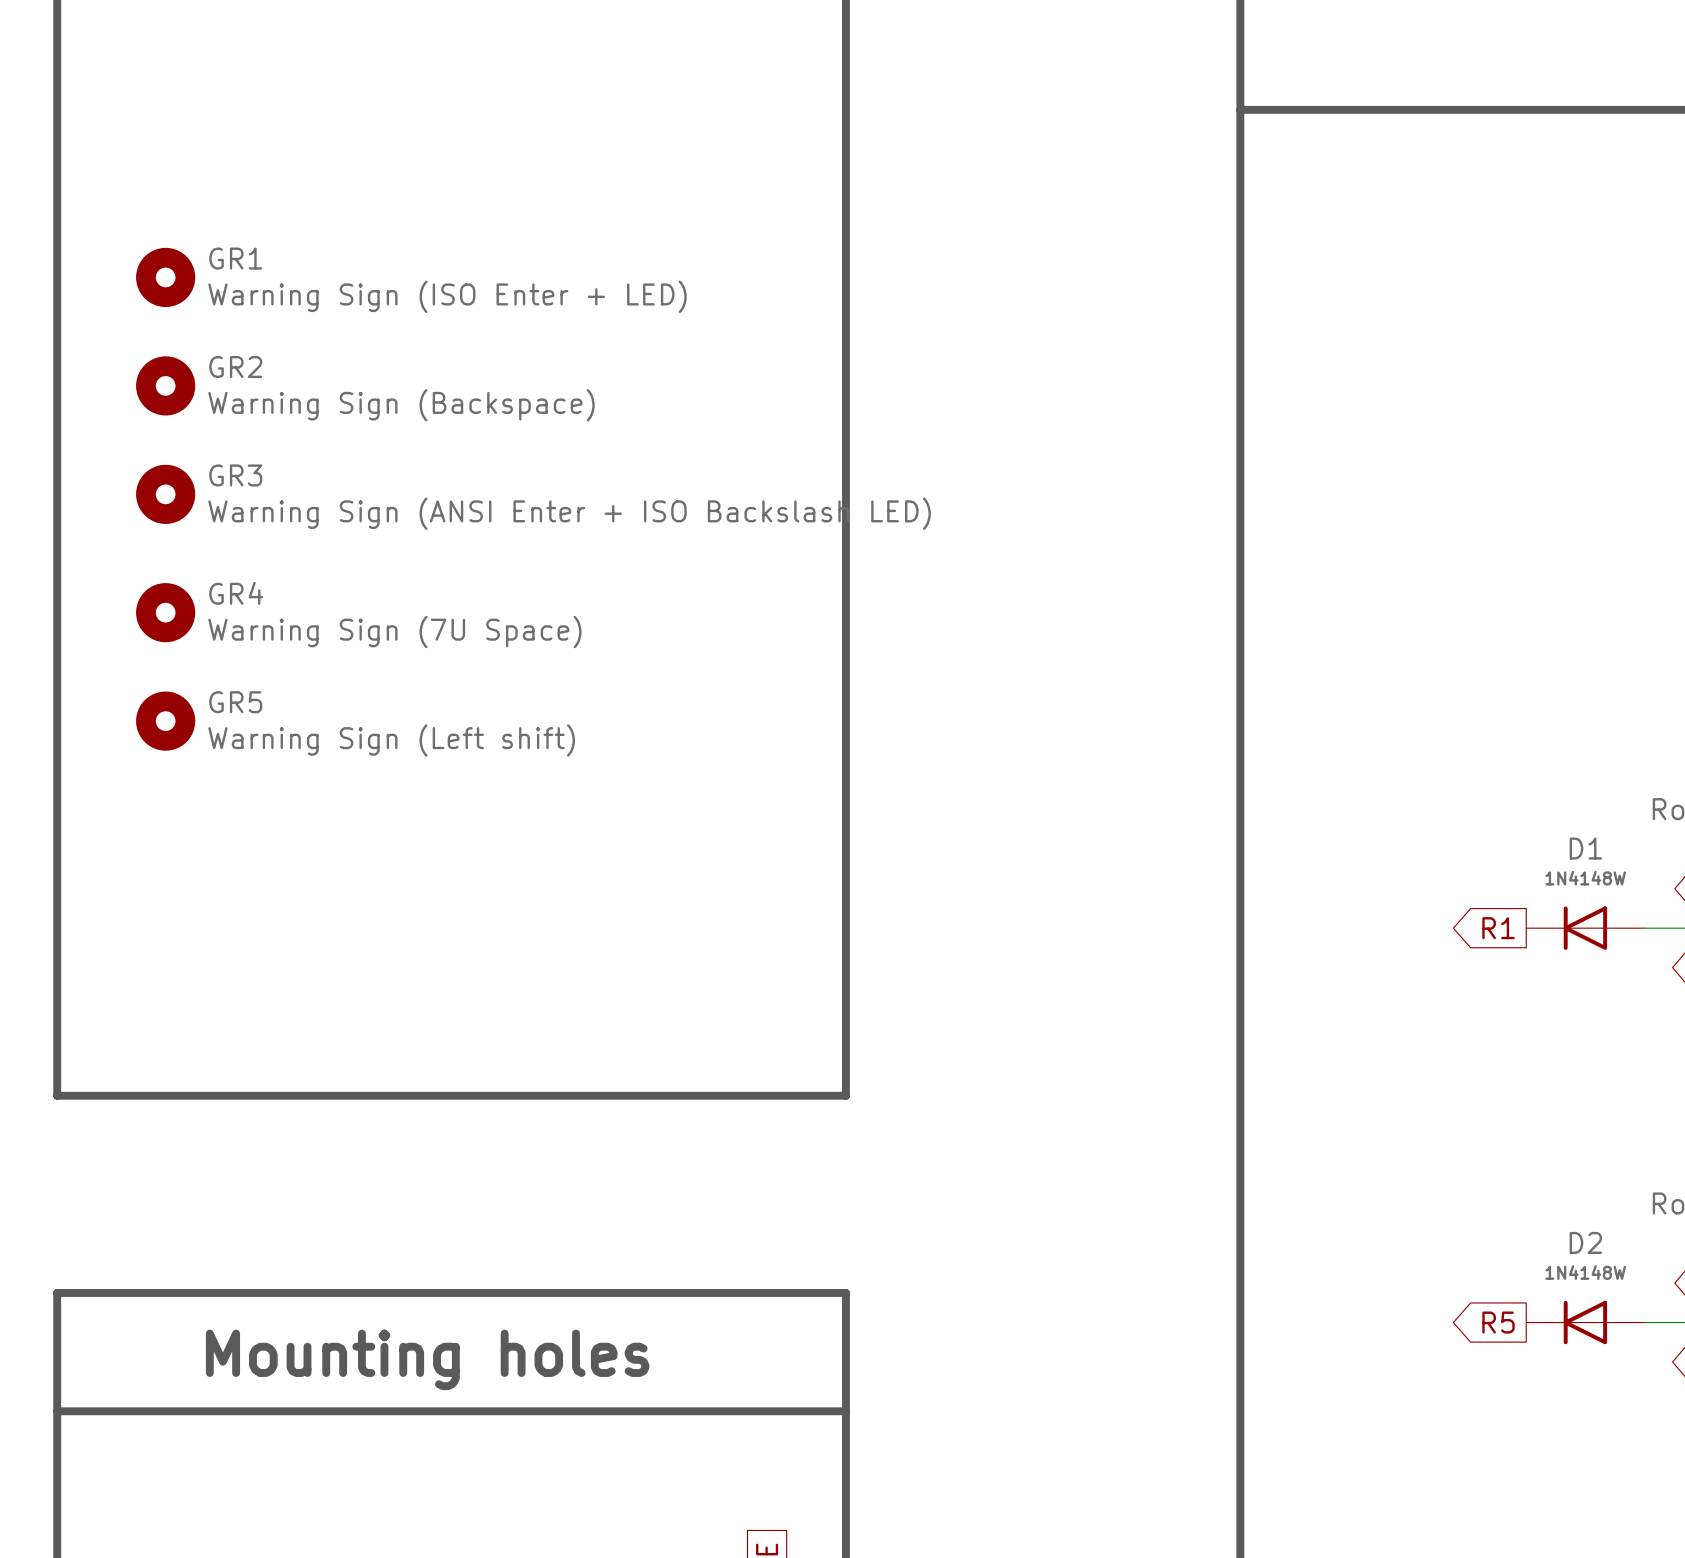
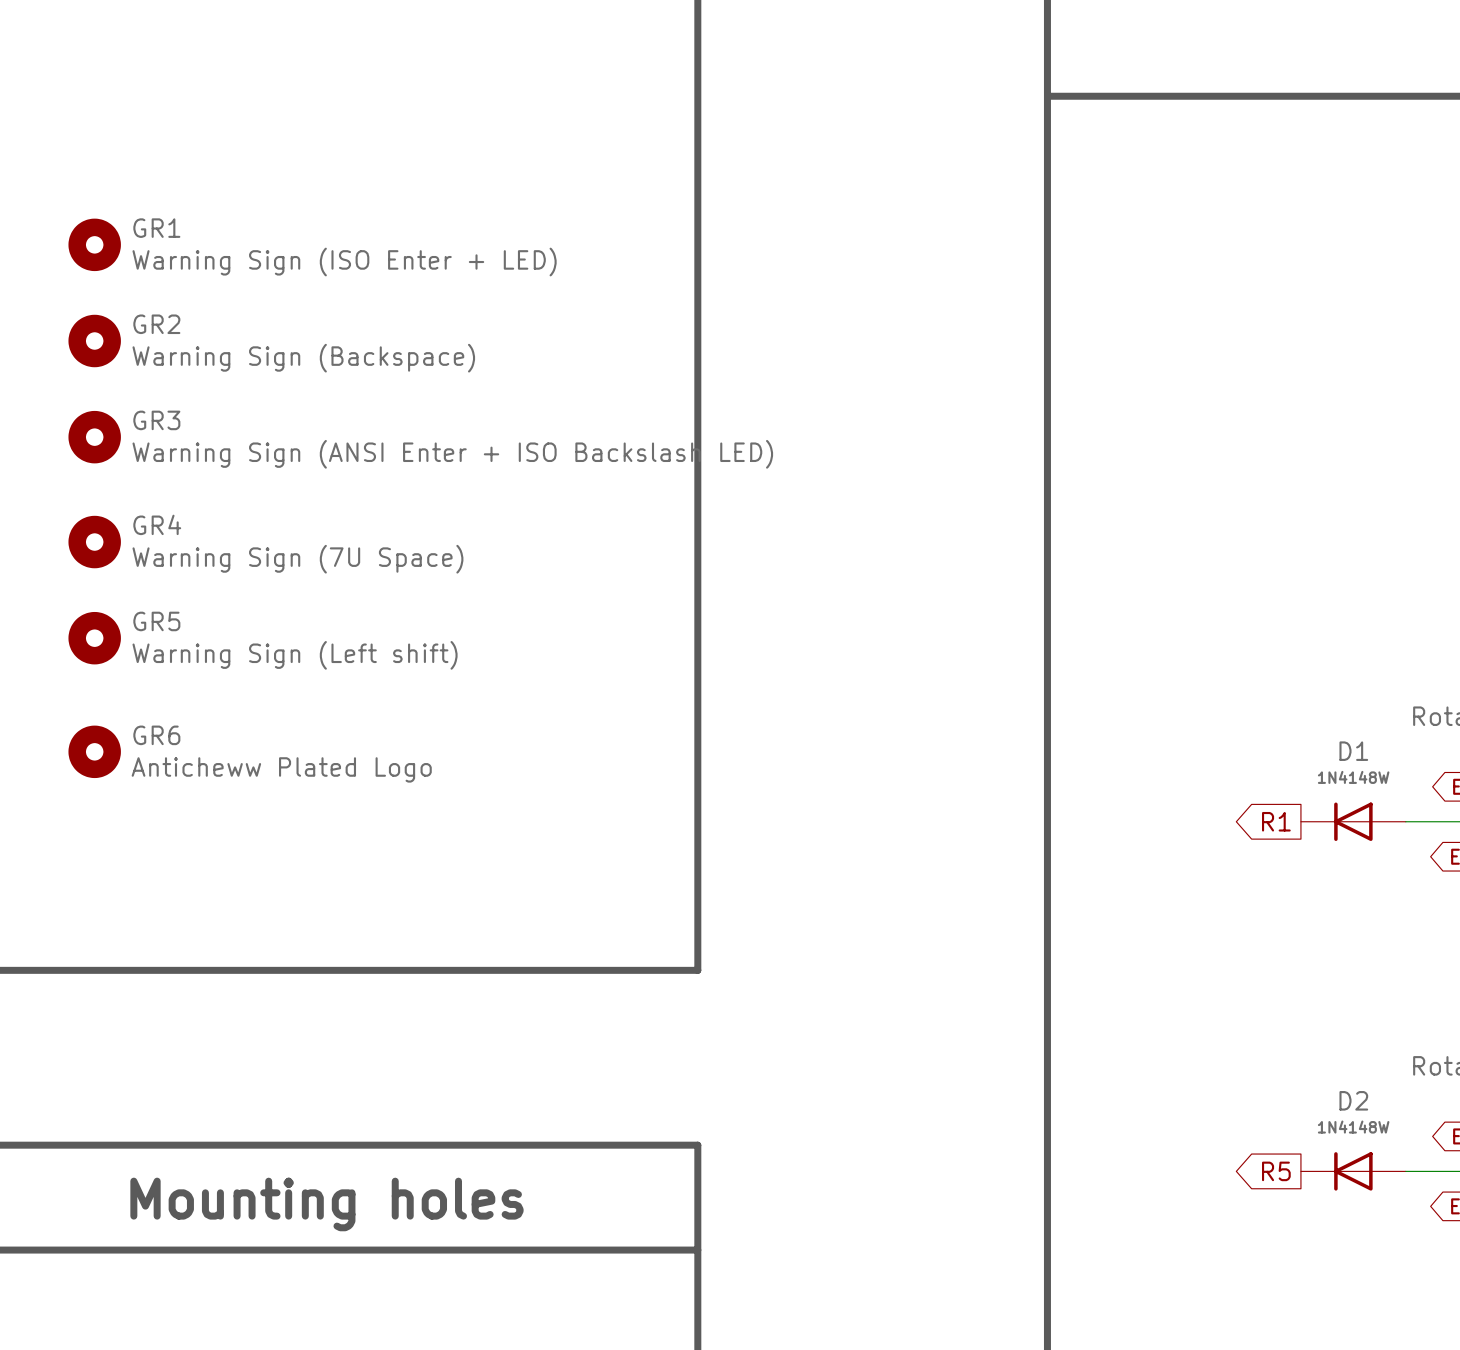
GR6: none -> Anticheww Plated Logo (94, 751)

